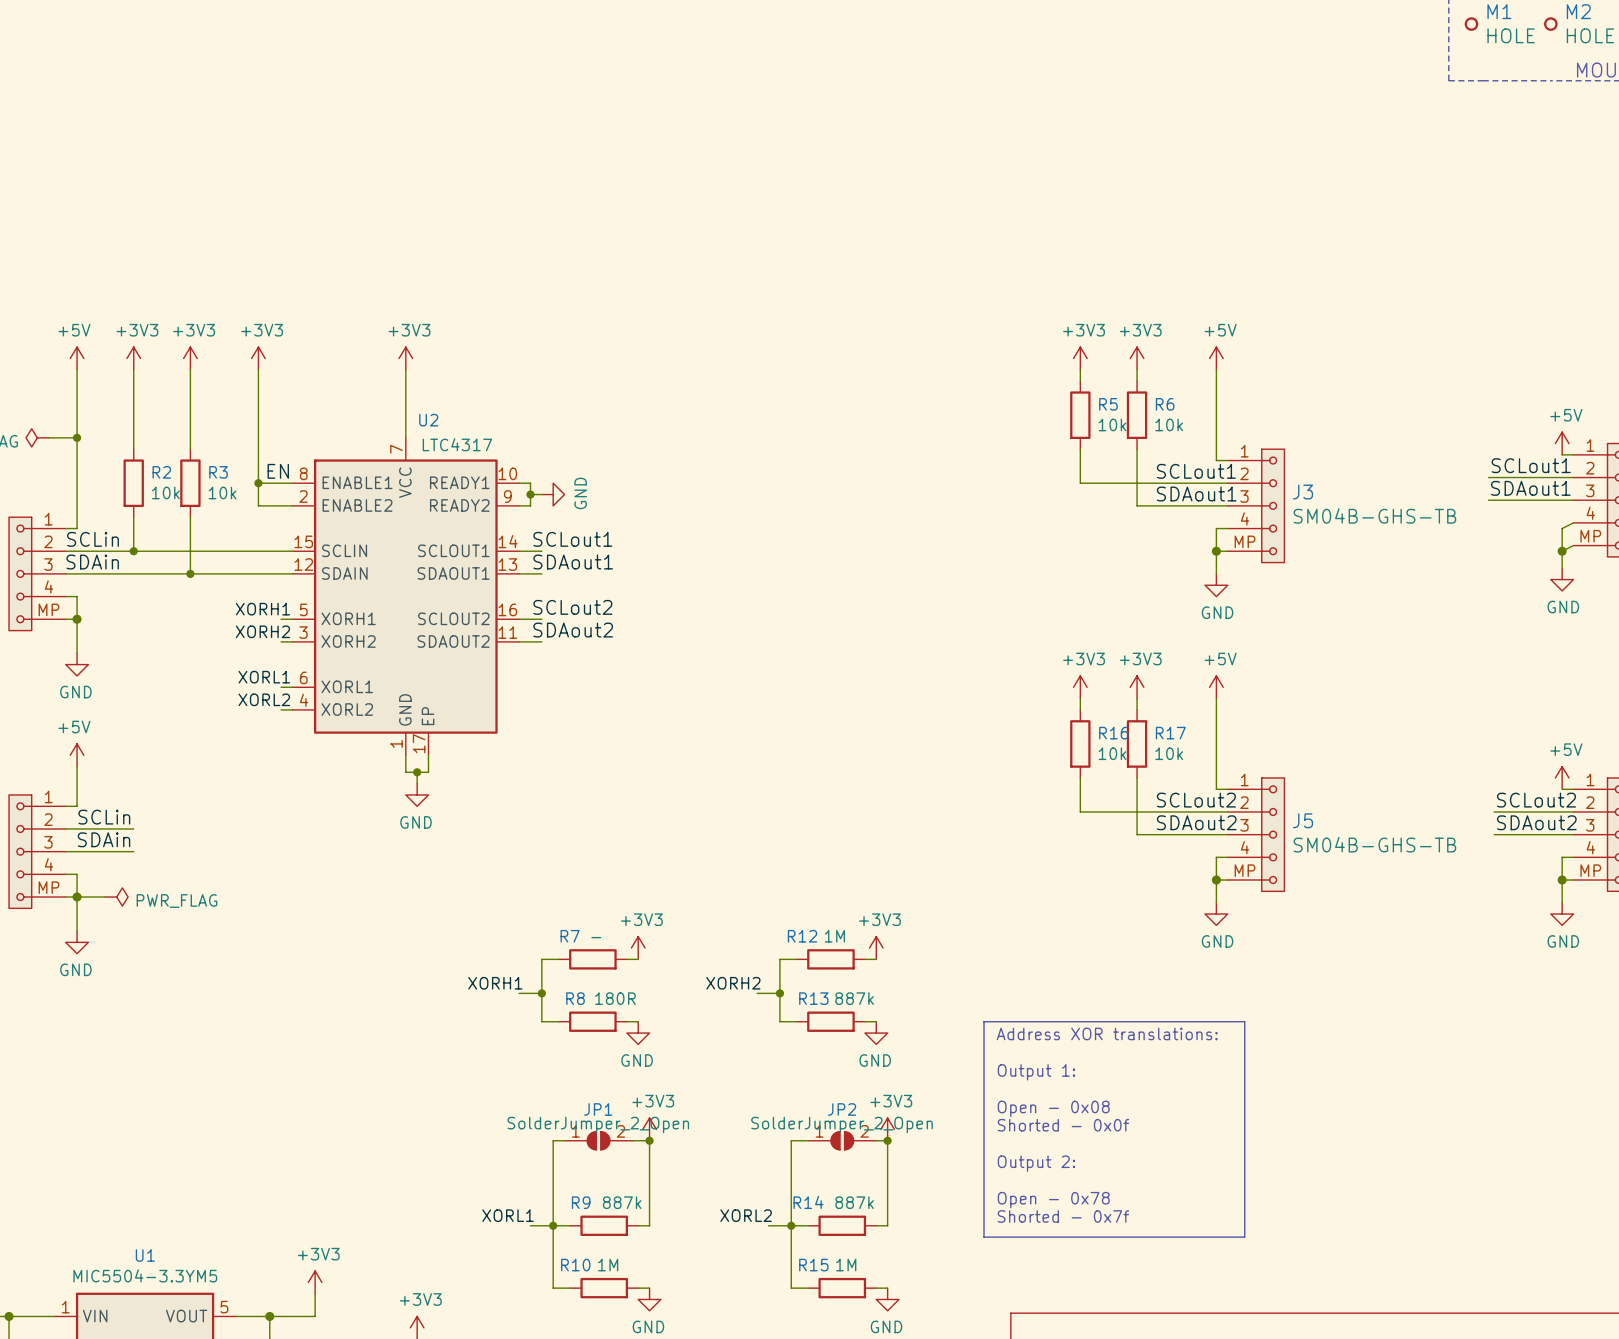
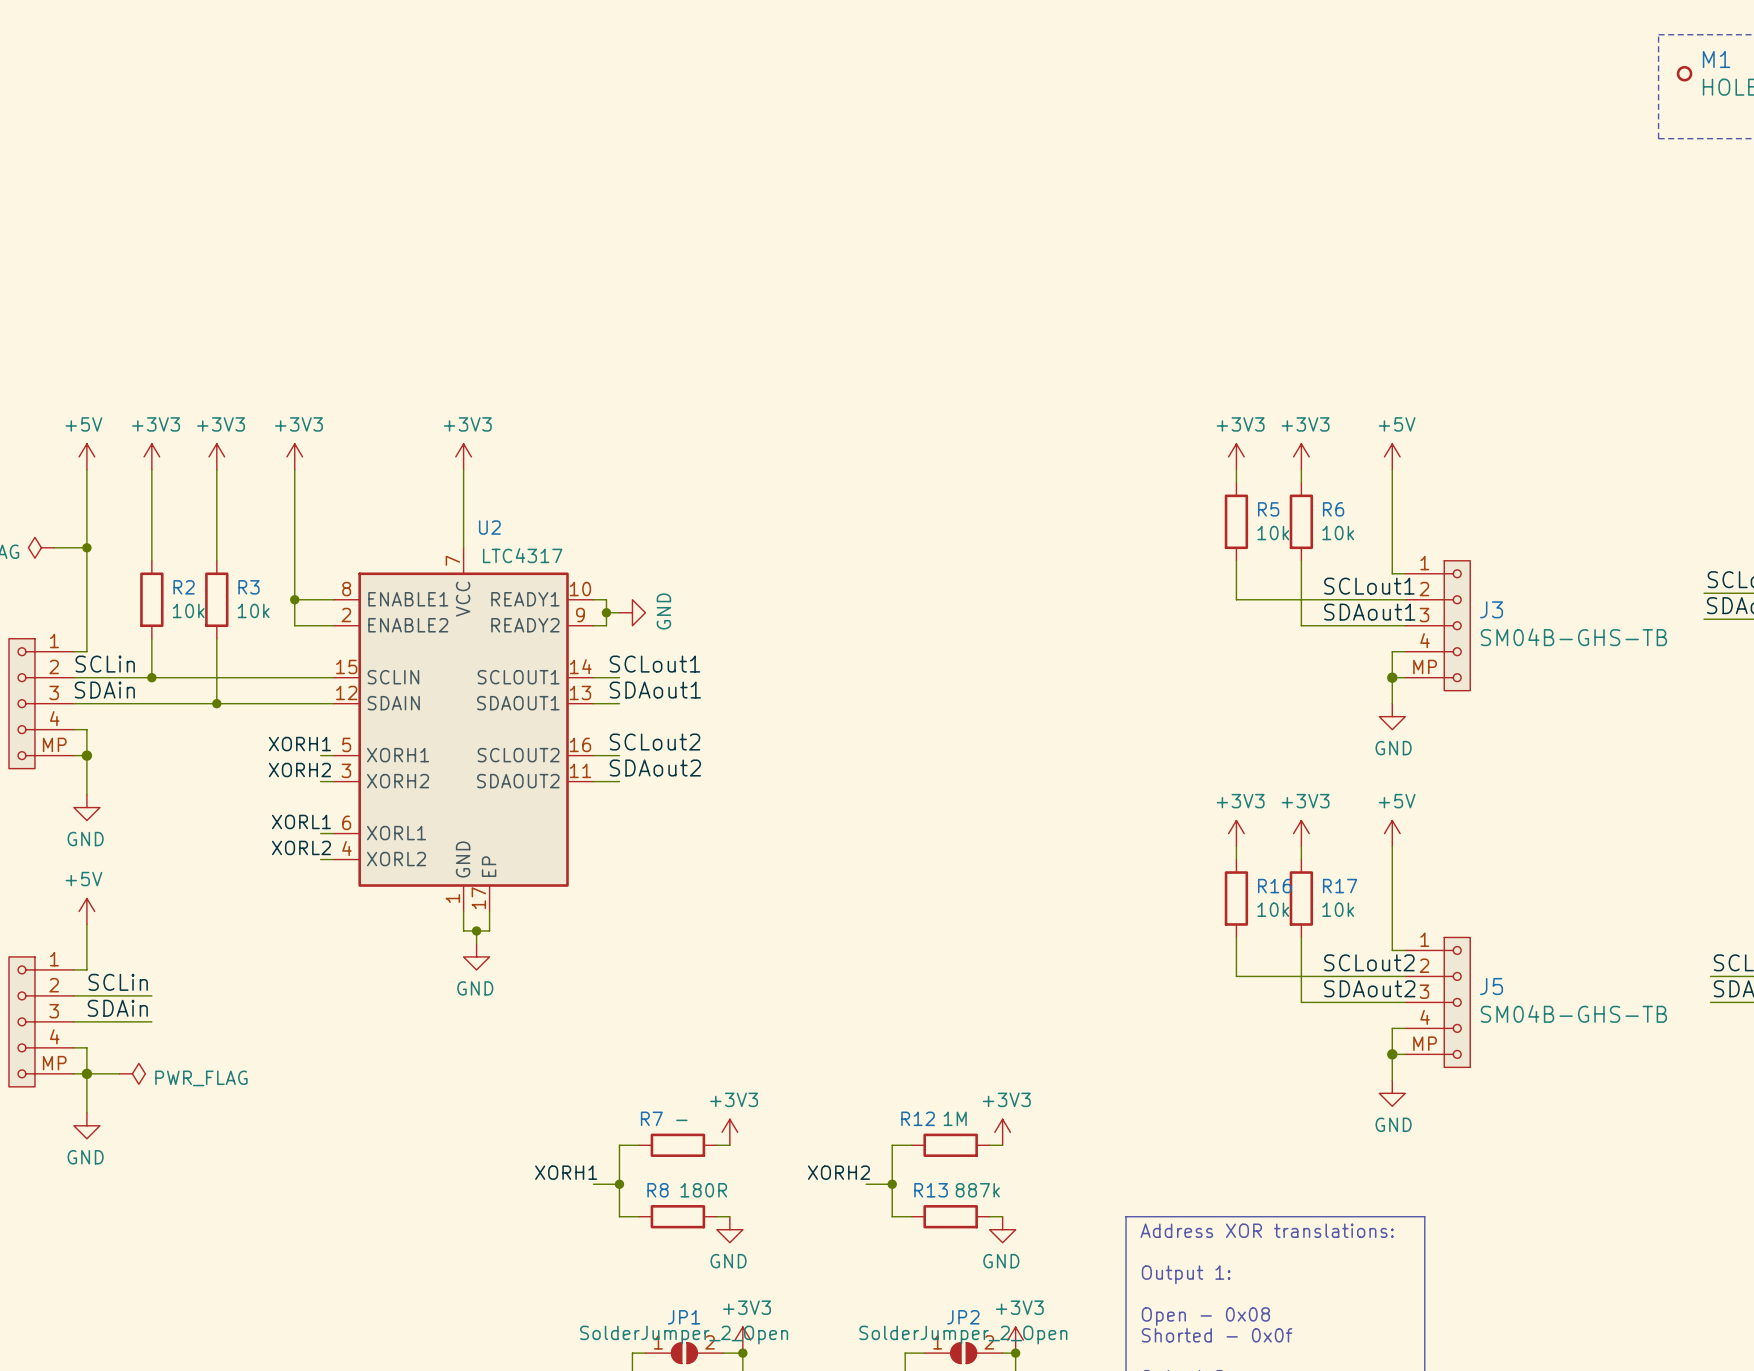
label: EN (278, 471) -> none

